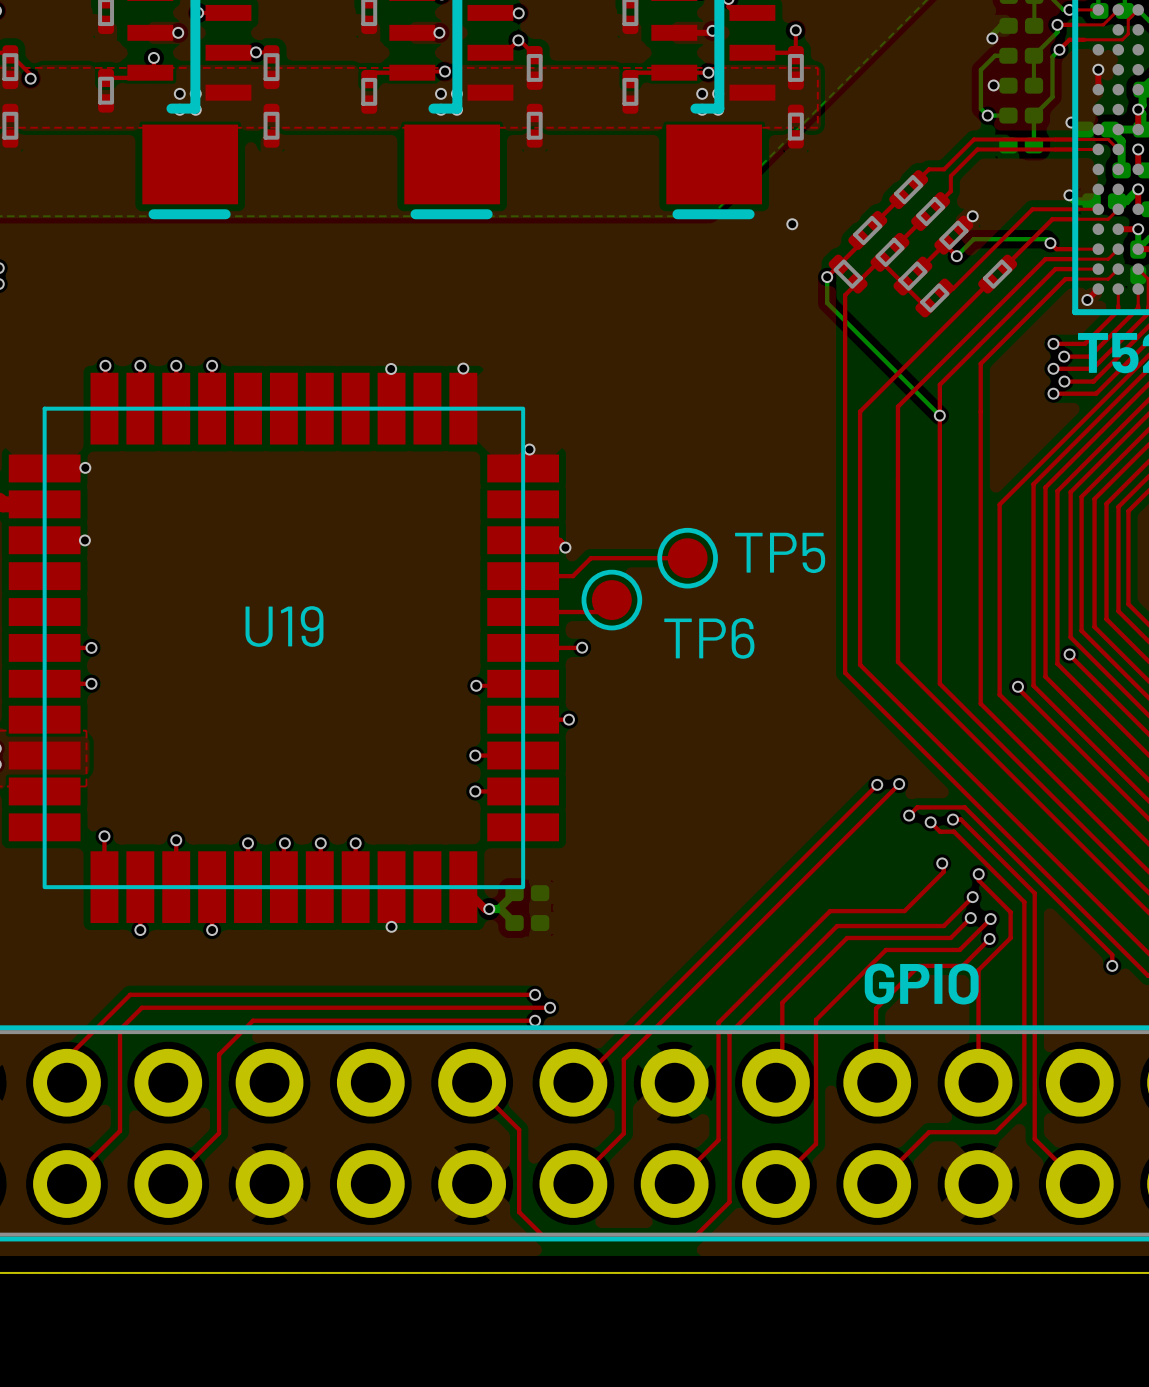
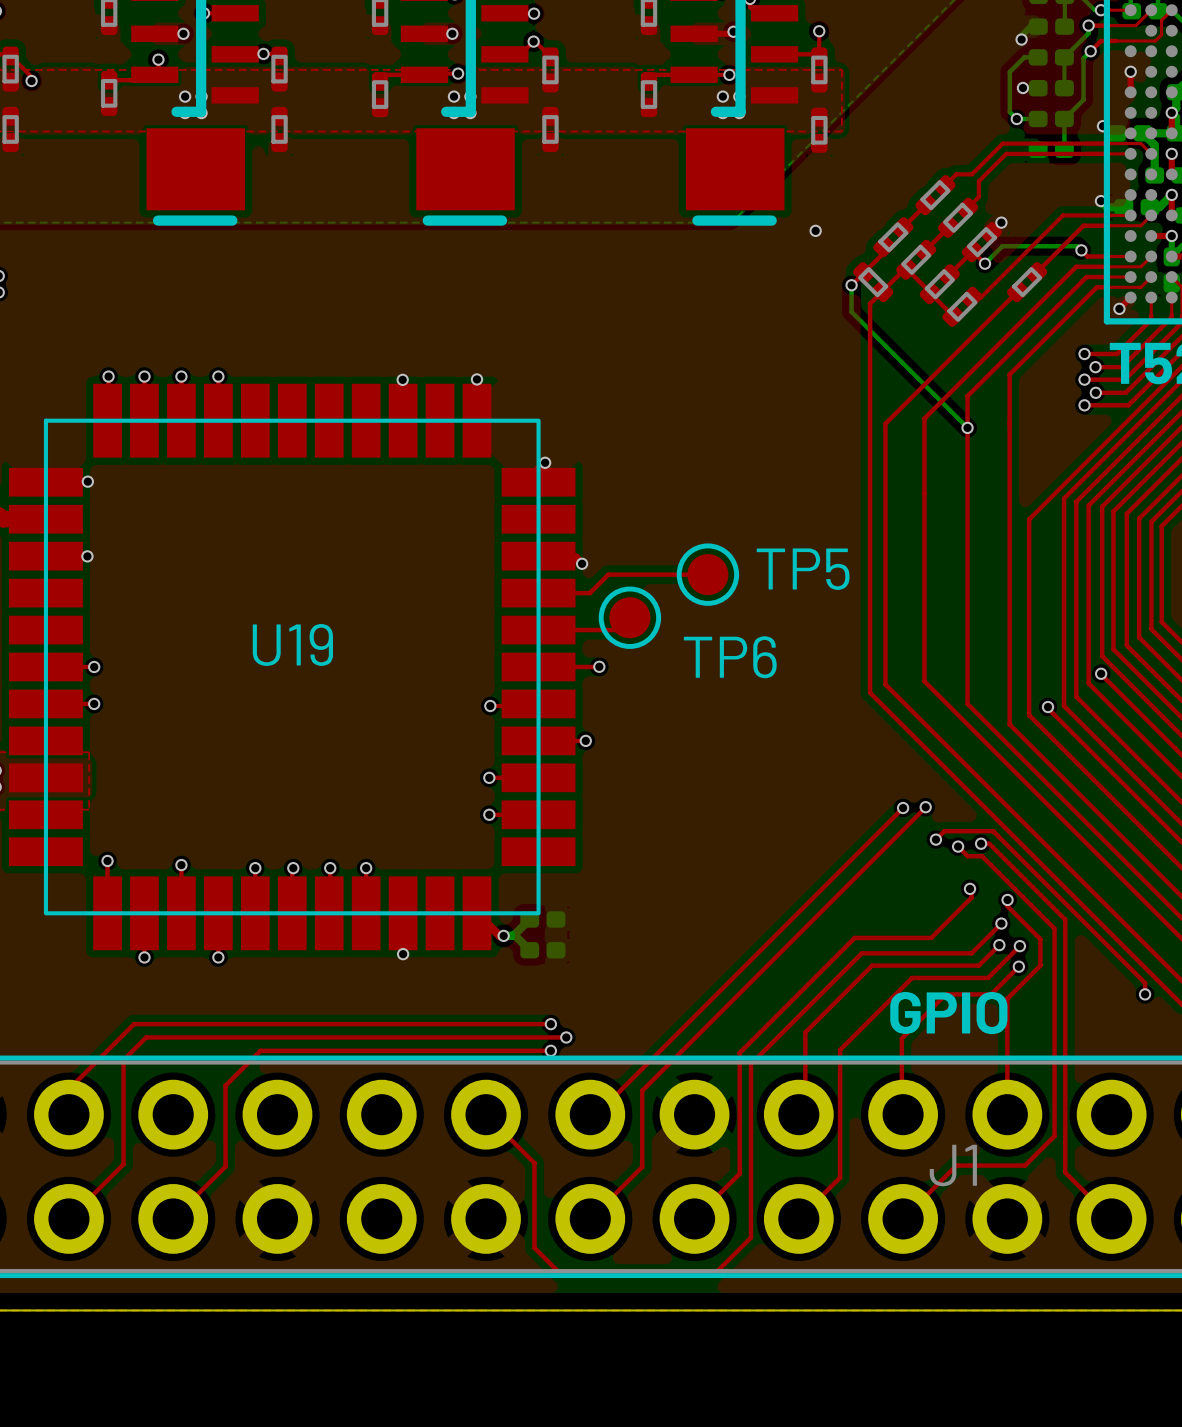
J1 name: none -> J1 (953, 1165)

